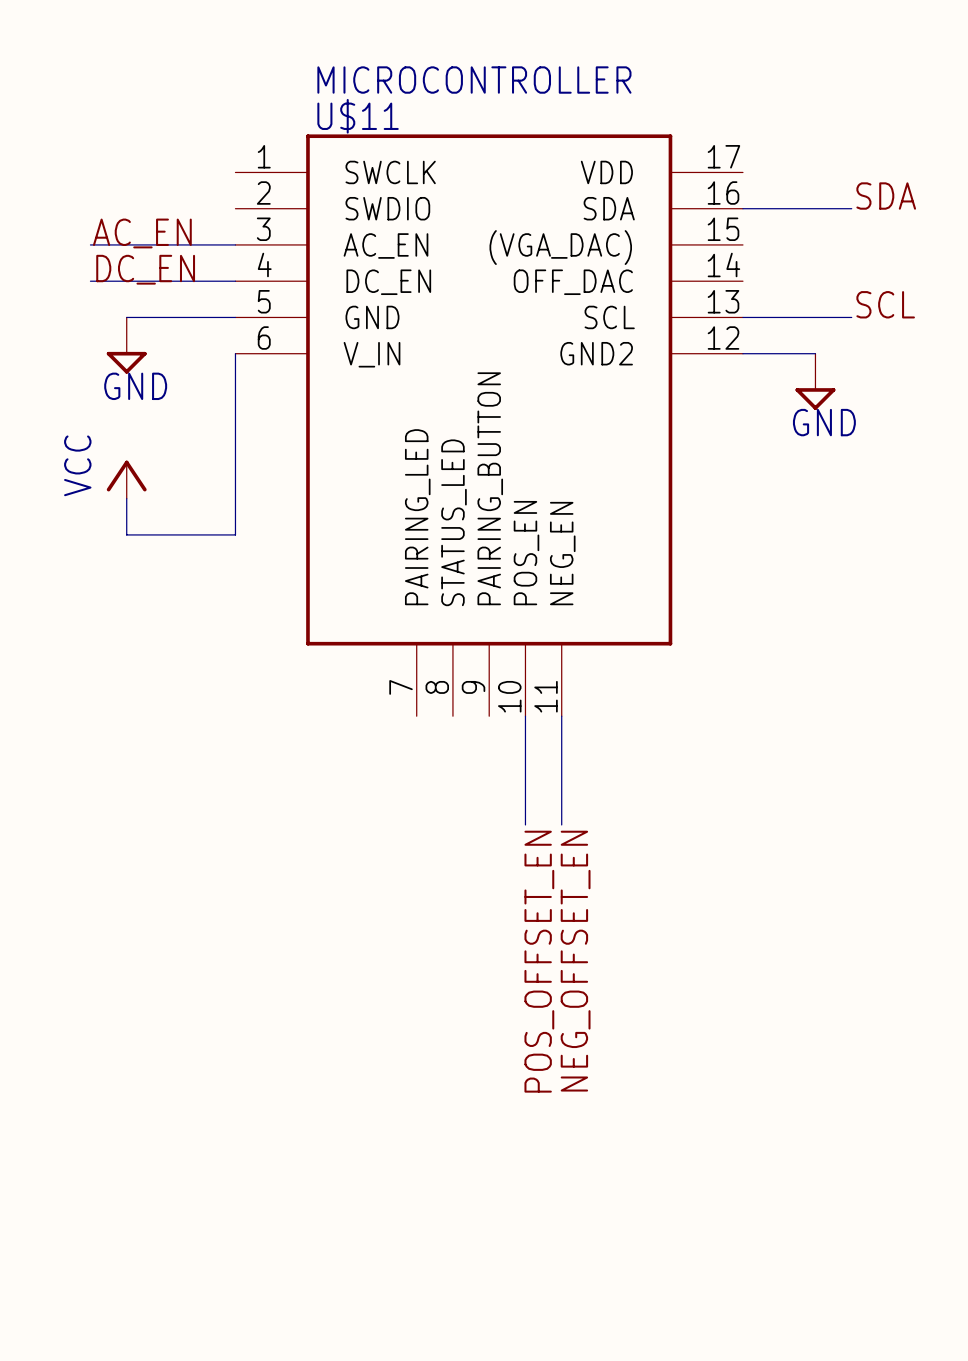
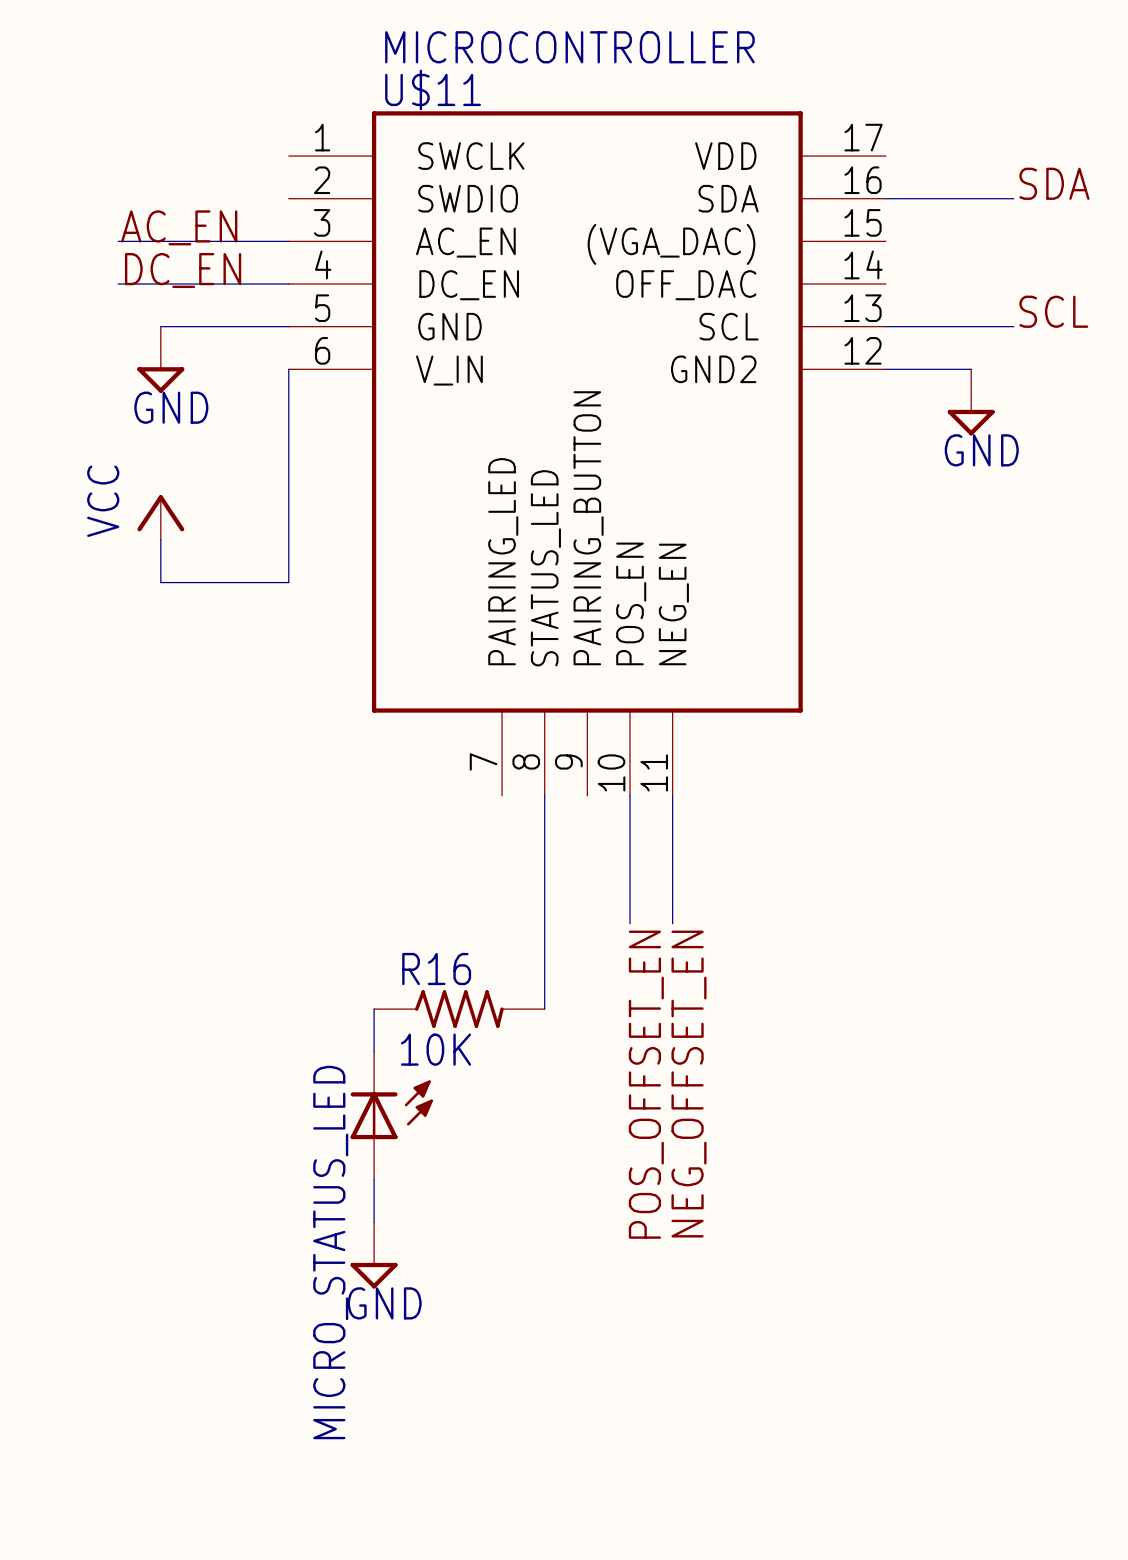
wire: none -> (544, 795) (544, 1009)
wire: none -> (374, 1009) (374, 1051)
R16: none -> 10K (459, 1009)
MICRO_STATUS_LED: none -> (391, 1115)
wire: none -> (374, 1179) (374, 1222)
power symbol: none -> GND (374, 1255)

